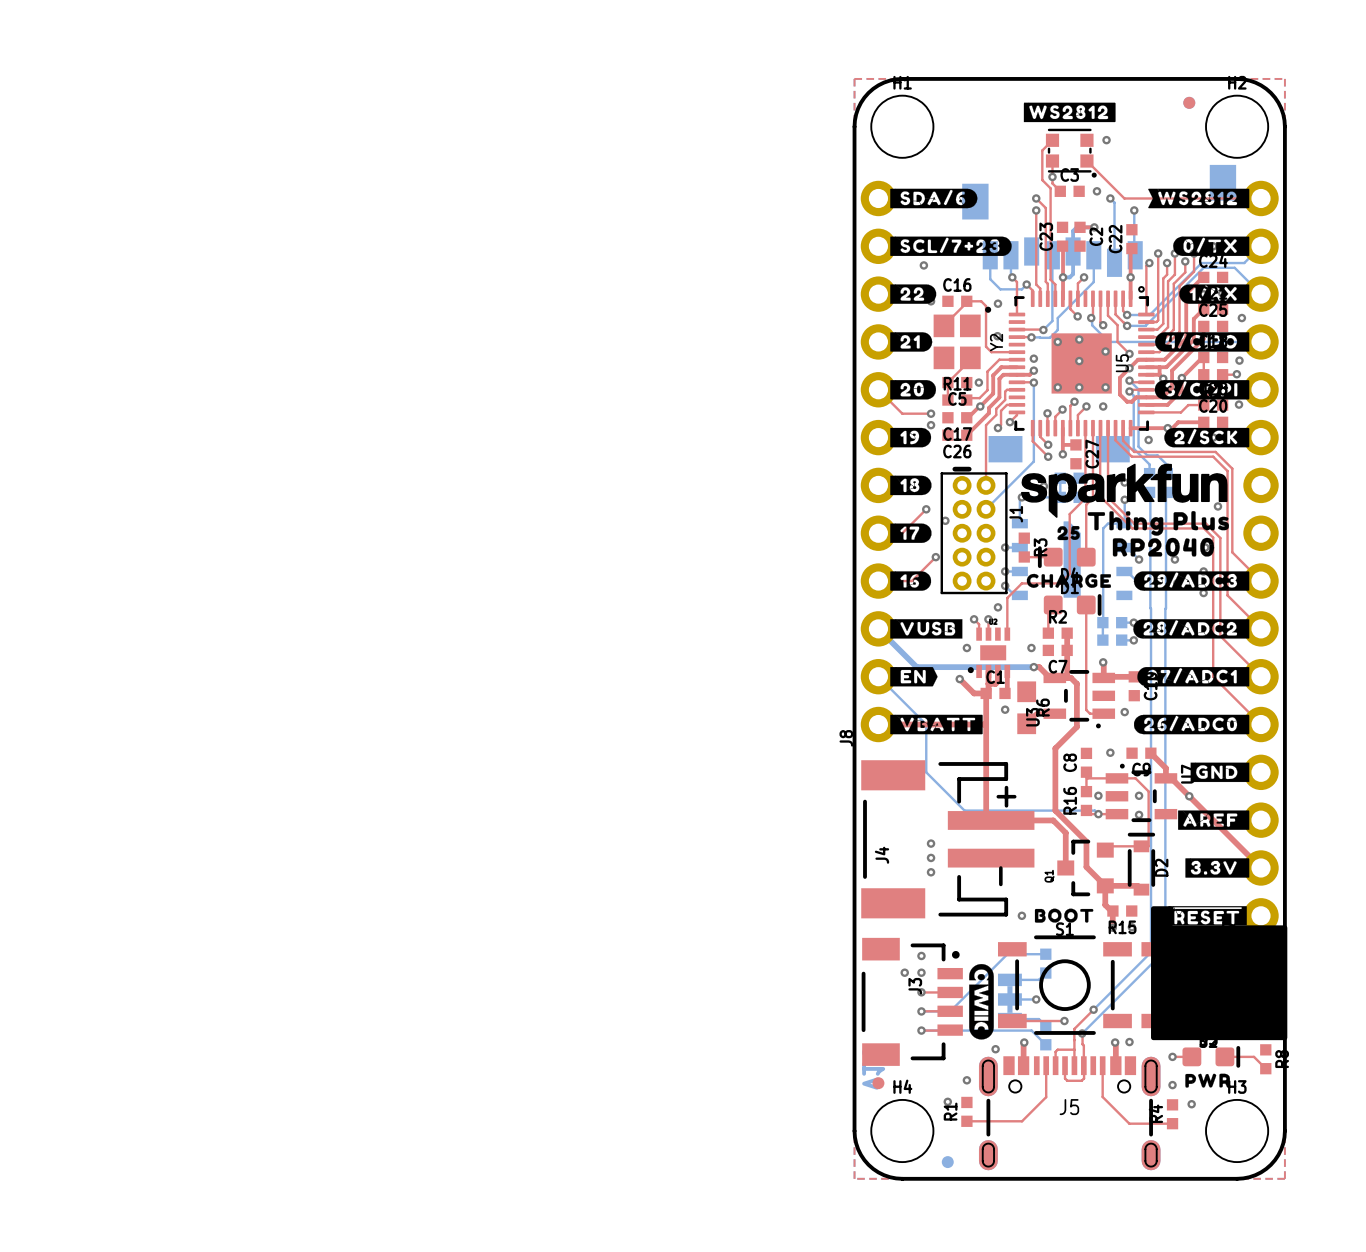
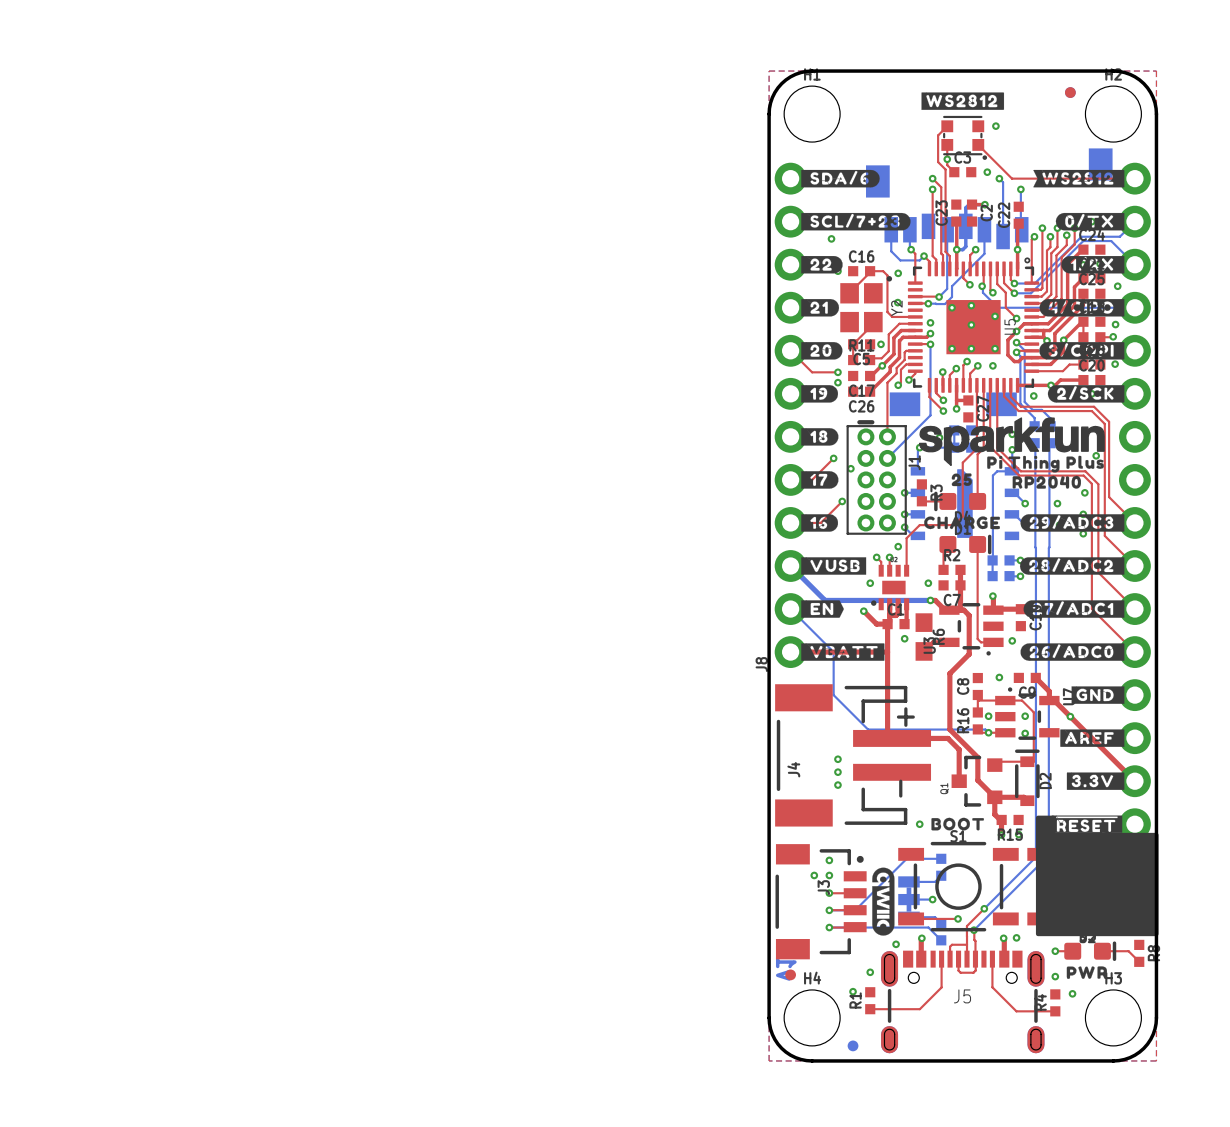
drawing: none -> [987, 455, 1104, 489]
drawing: [1087, 511, 1229, 557] -> none

